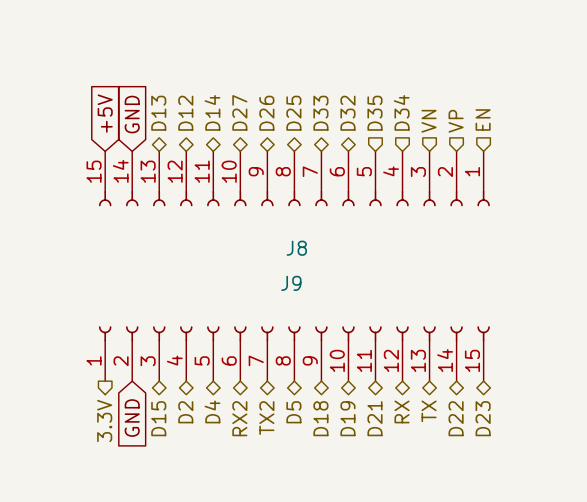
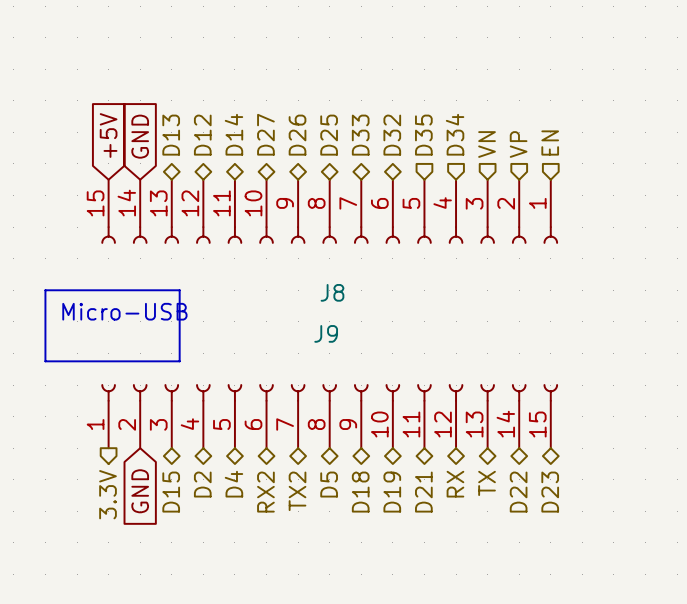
line: none -> (45, 290) (179, 290) (179, 361) (45, 361) (45, 290)
text: none -> Micro-USB (124, 311)

